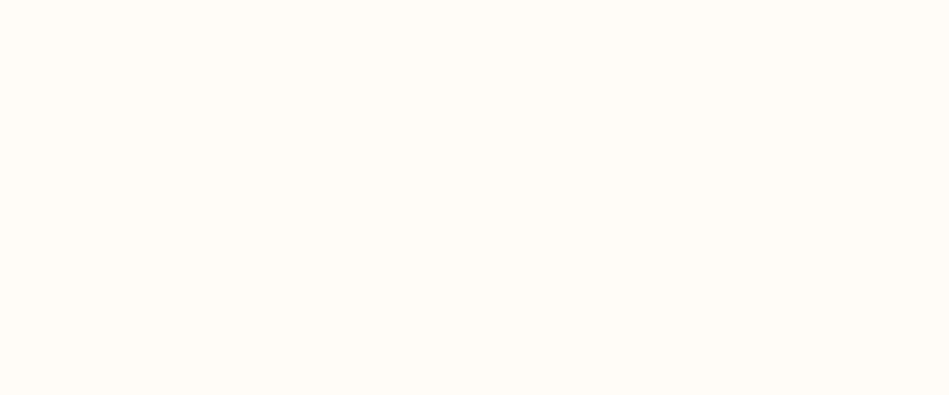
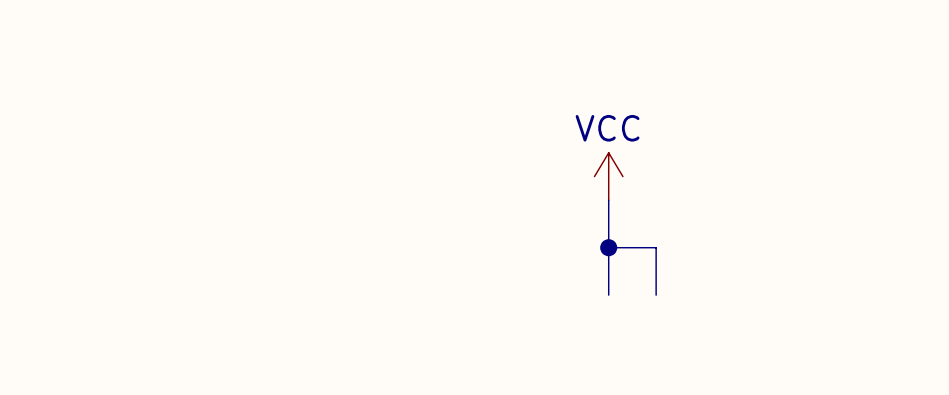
power symbol: none -> VCC (608, 176)
wire: none -> (608, 200) (608, 295)
wire: none -> (608, 247) (656, 247) (656, 295)
junction: none -> (608, 247)

